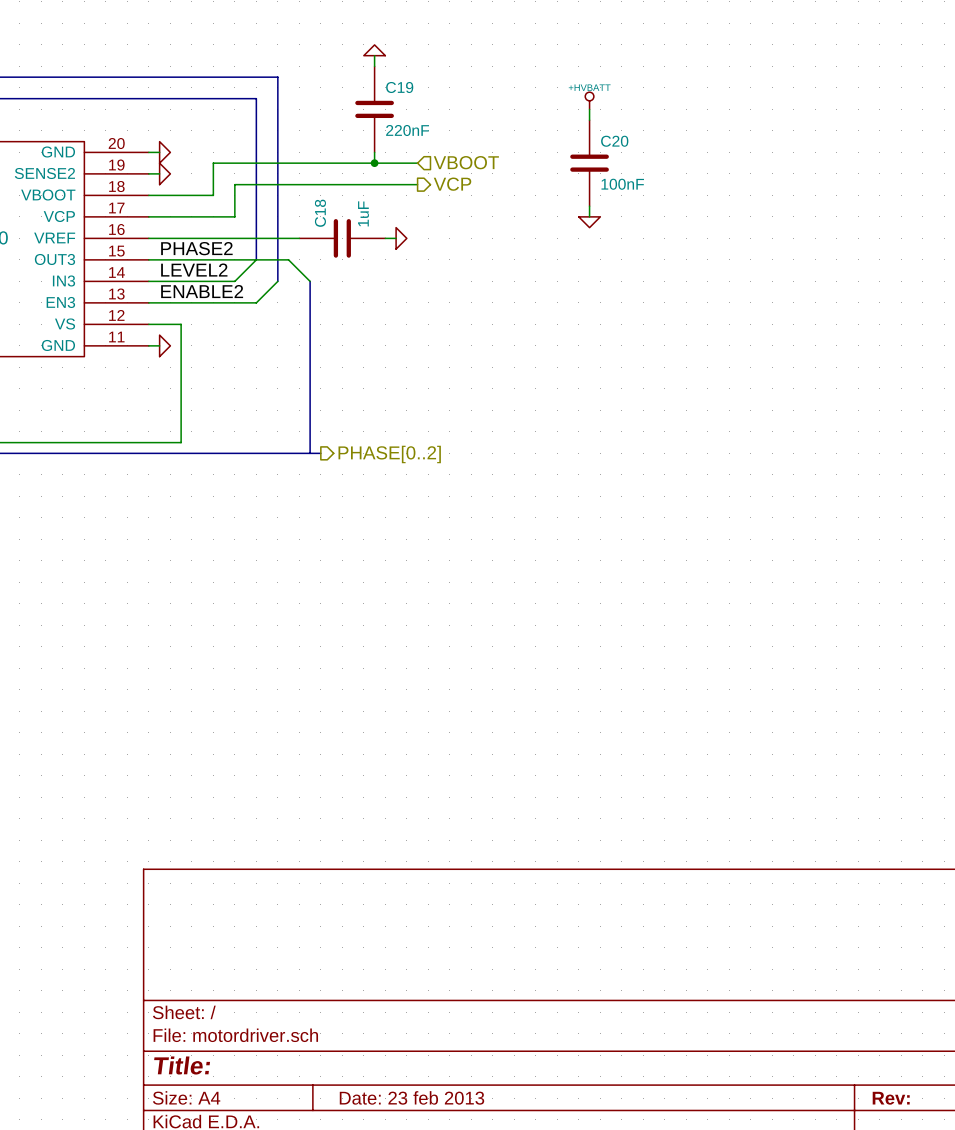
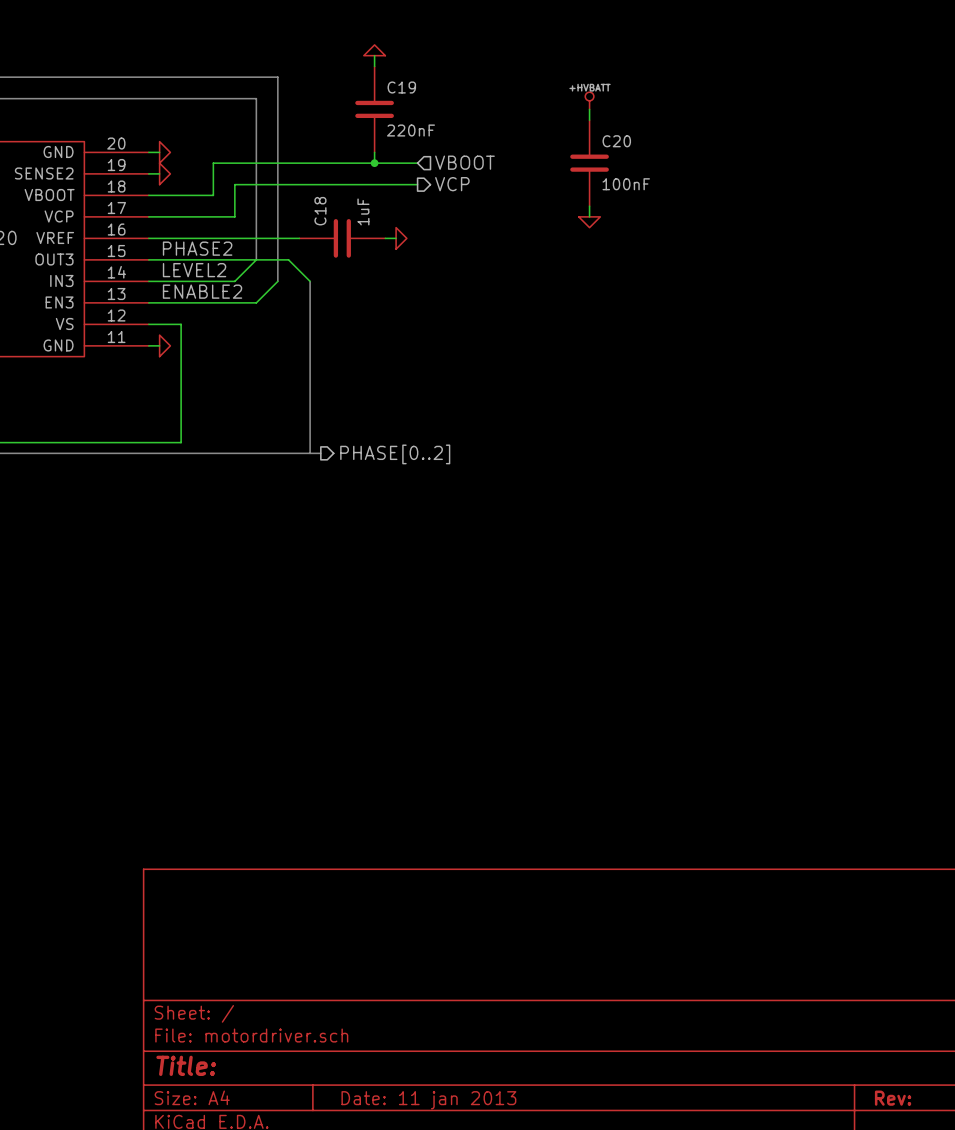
title block: Date: 23 feb 2013 (411, 1097) -> Date: 11 jan 2013 (428, 1100)

